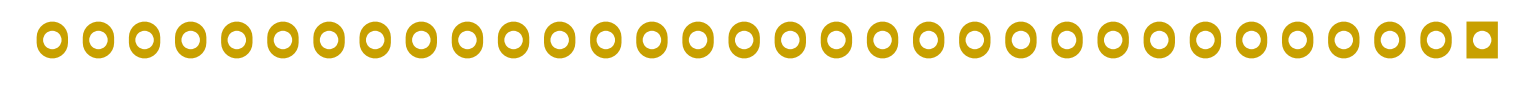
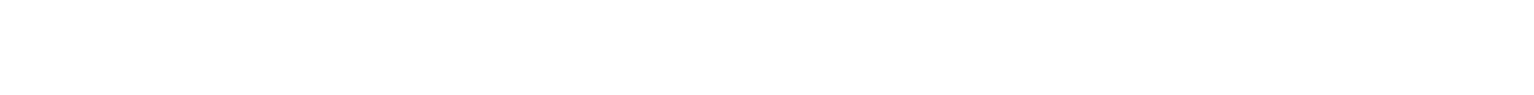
part: (767, 40) -> none

